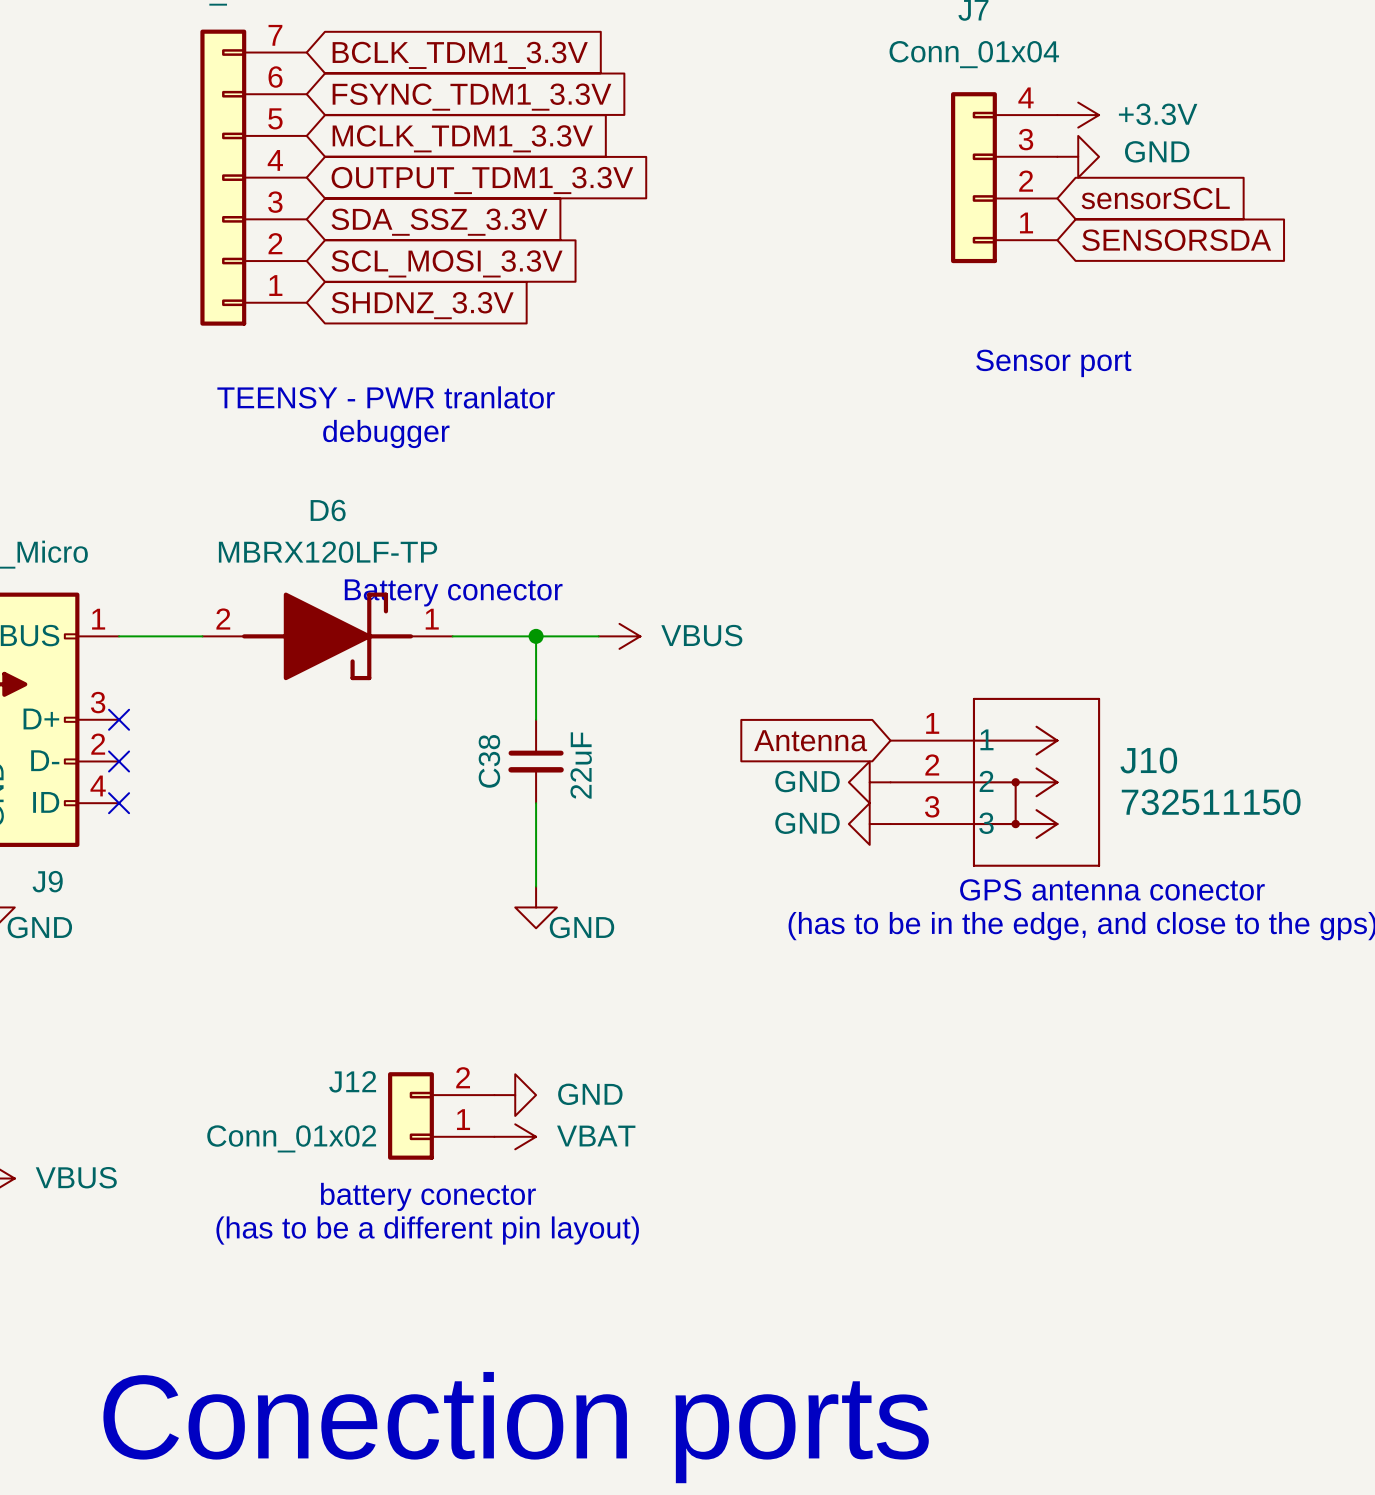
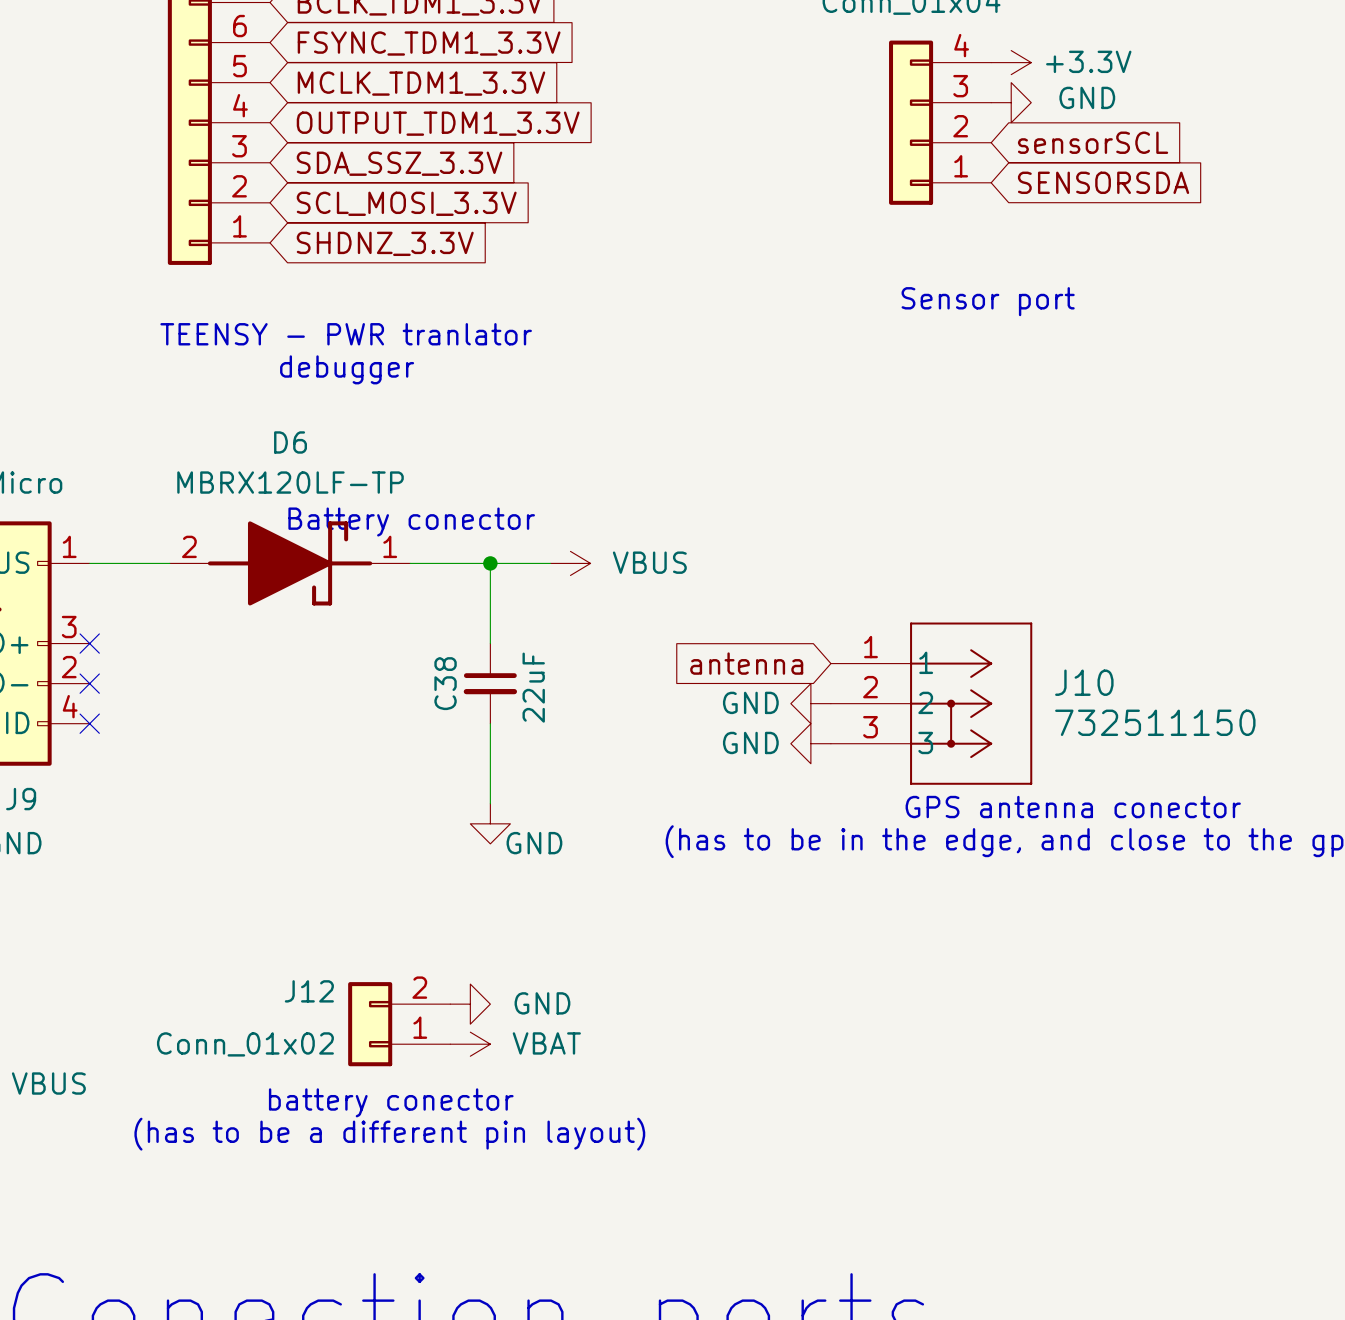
global label: Antenna (810, 740) -> antenna (746, 663)

